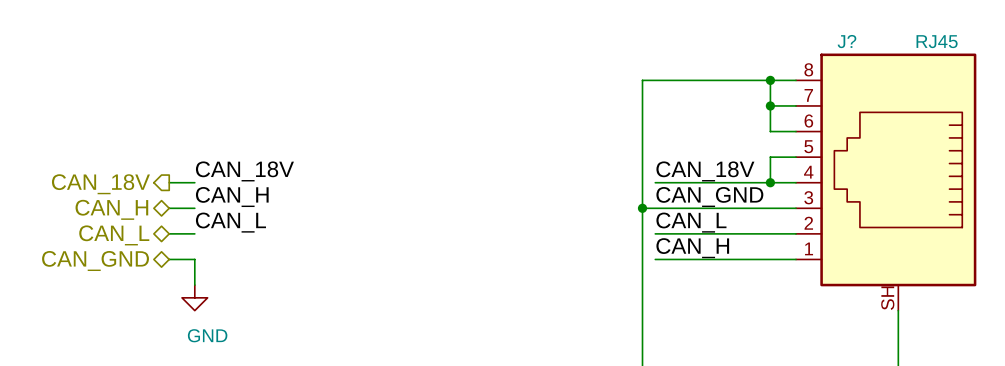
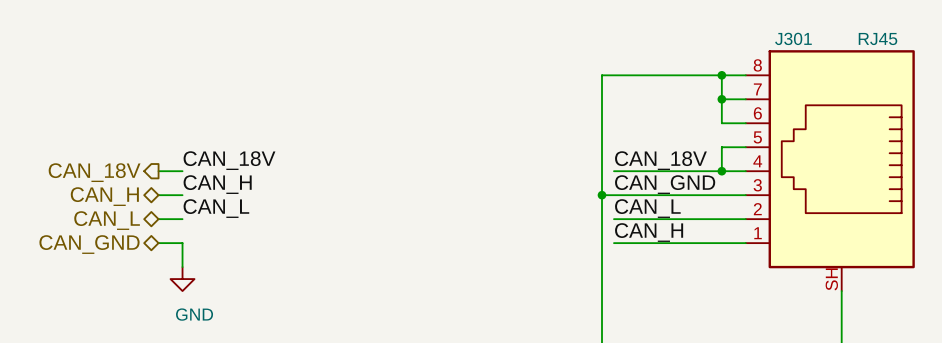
J? name: J? (846, 41) -> J301 (793, 38)

